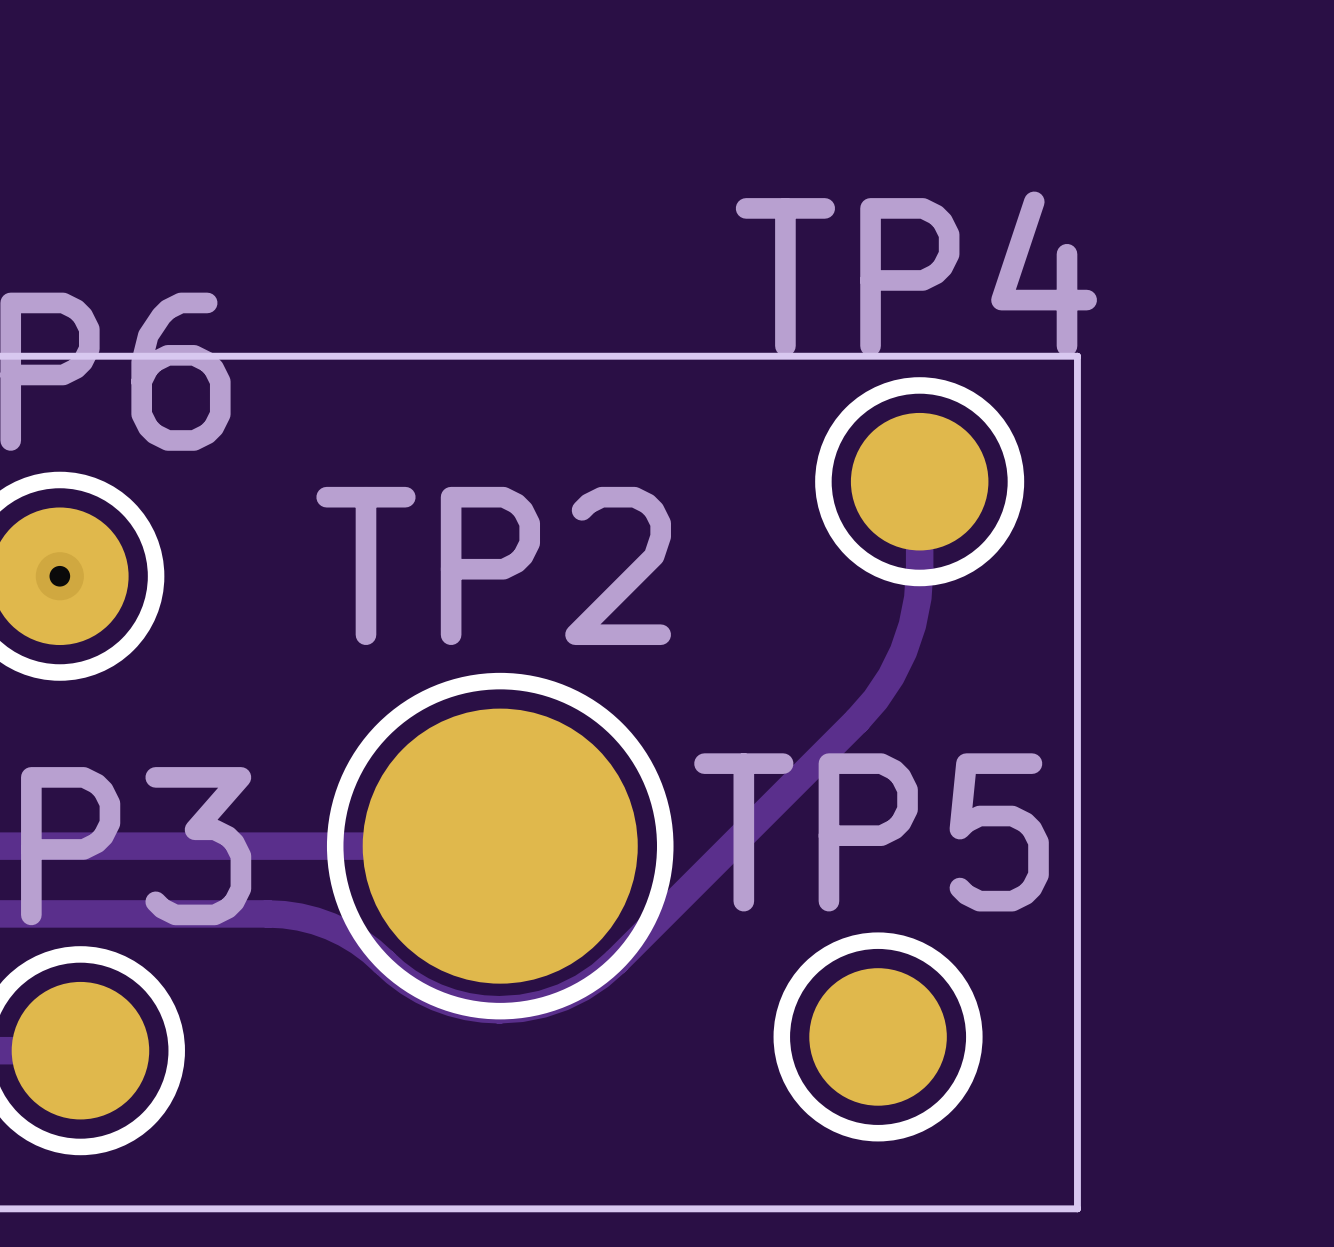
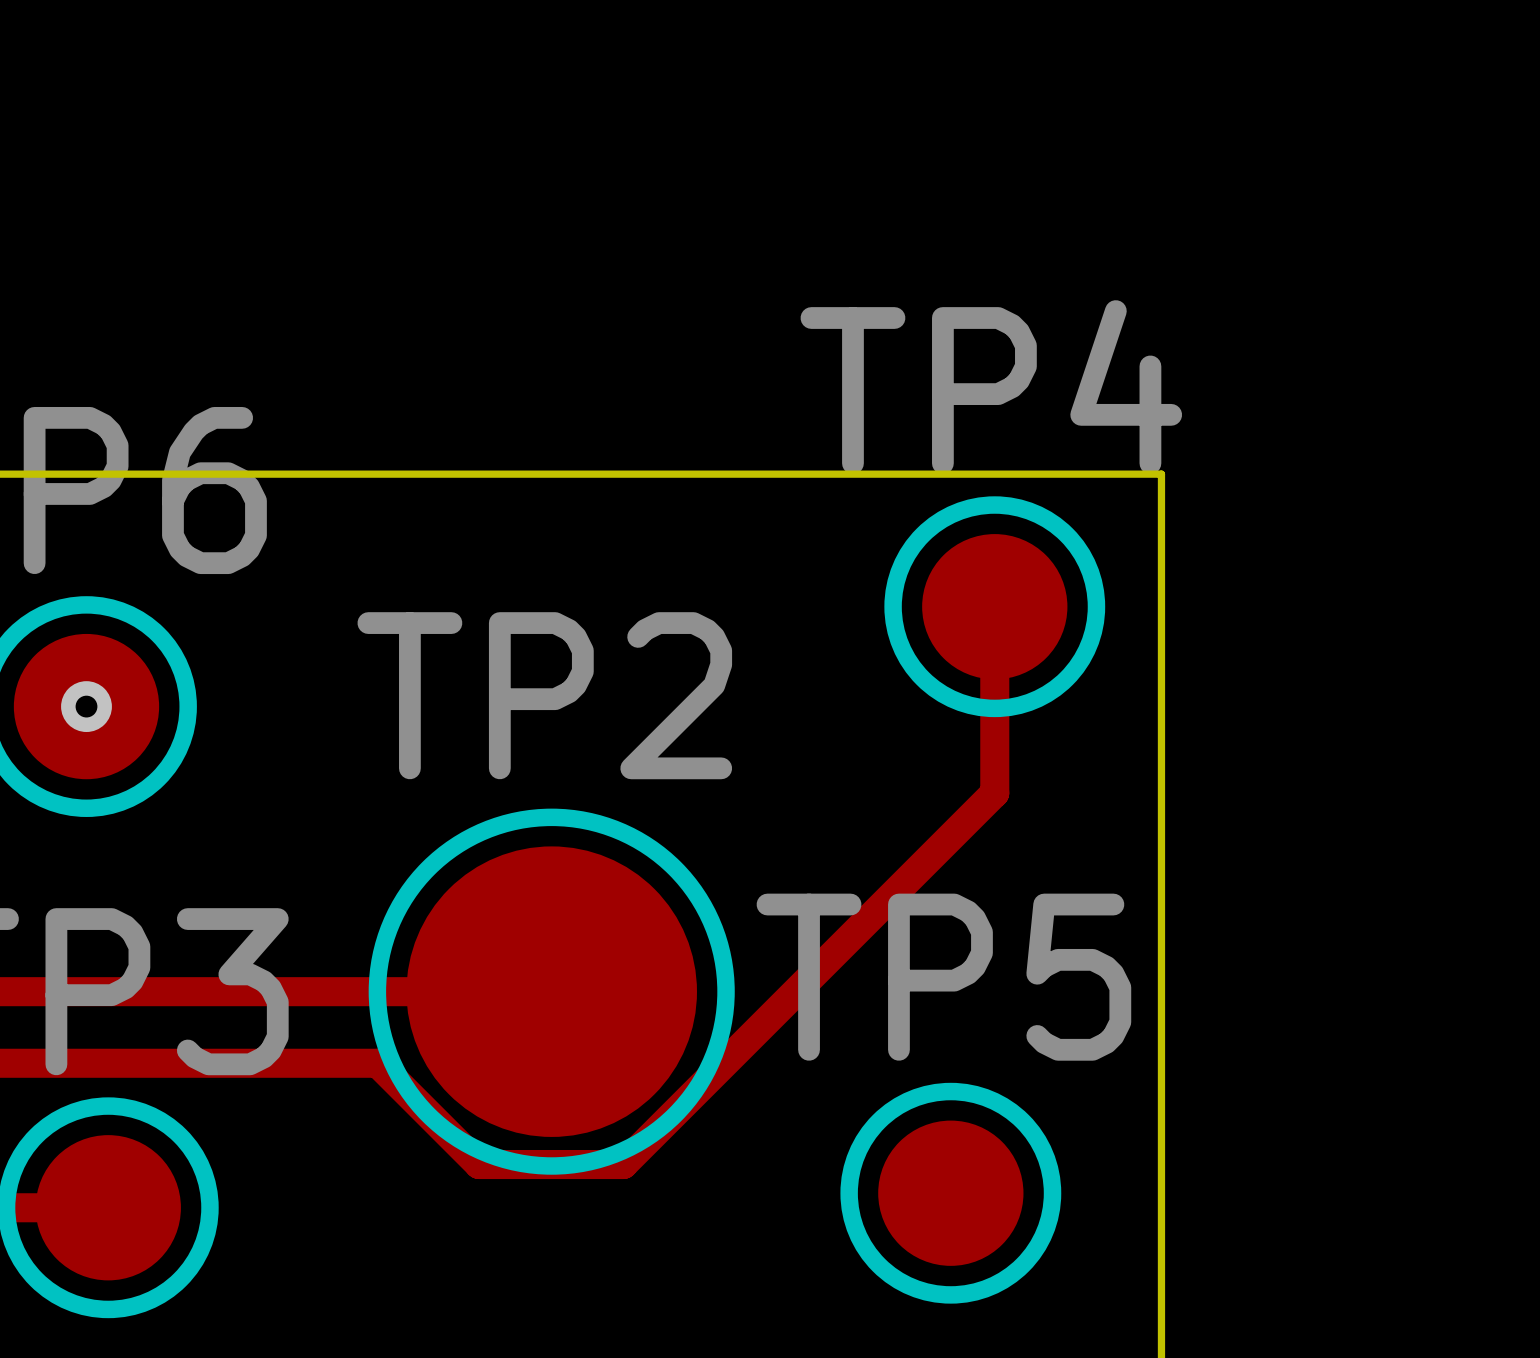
track: (919, 569) (917, 597) (912, 625) (903, 651) (891, 676) (875, 699) (857, 720) -> (994, 699) (994, 793) (928, 858)
track: (267, 913) (299, 917) (330, 926) (358, 941) (395, 972) (422, 990) (451, 1002) (483, 1008) (521, 1008) (562, 997) (600, 975) (616, 961) -> (306, 1063) (377, 1063) (479, 1164) (623, 1164) (674, 1113)

